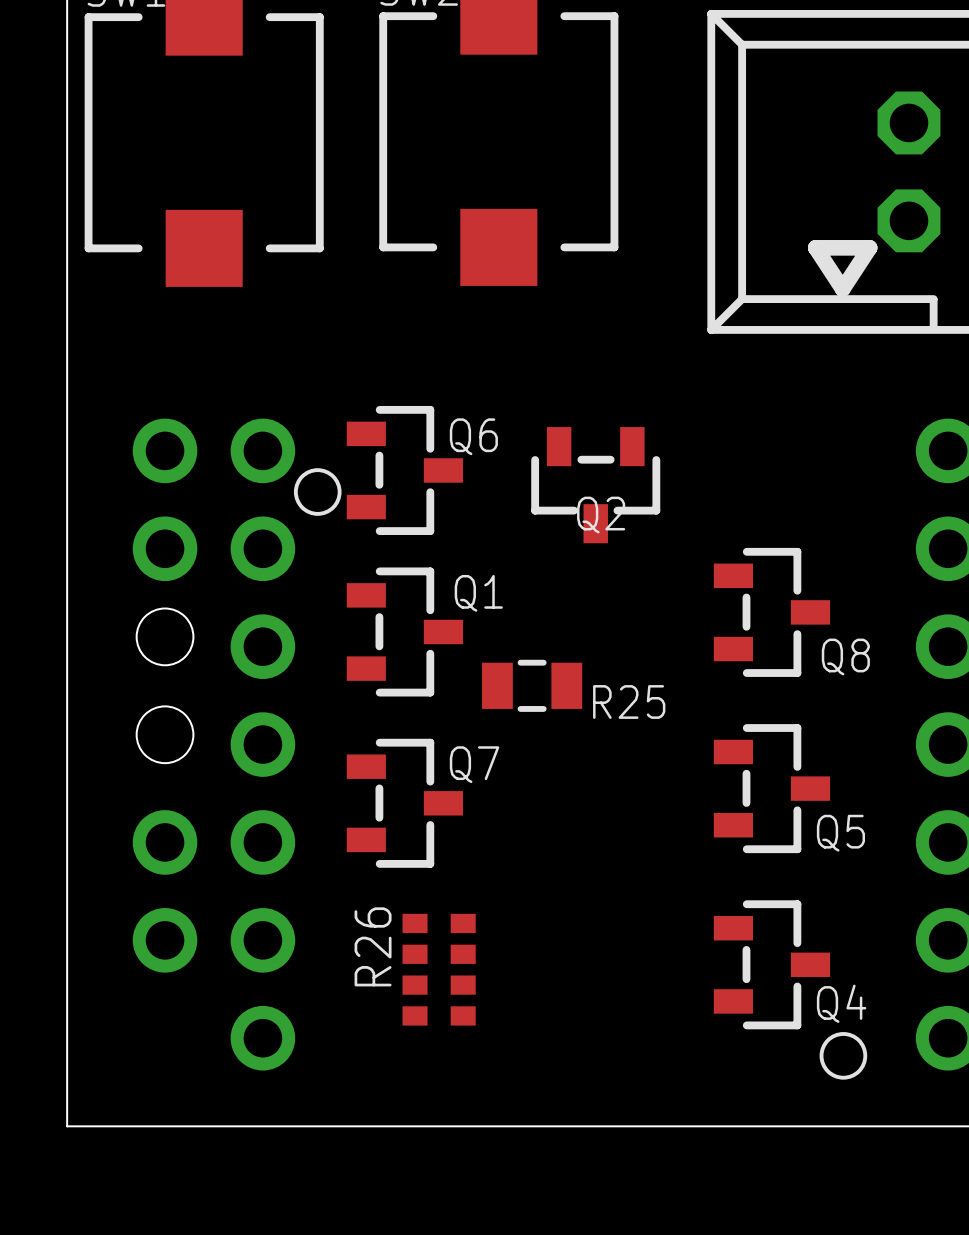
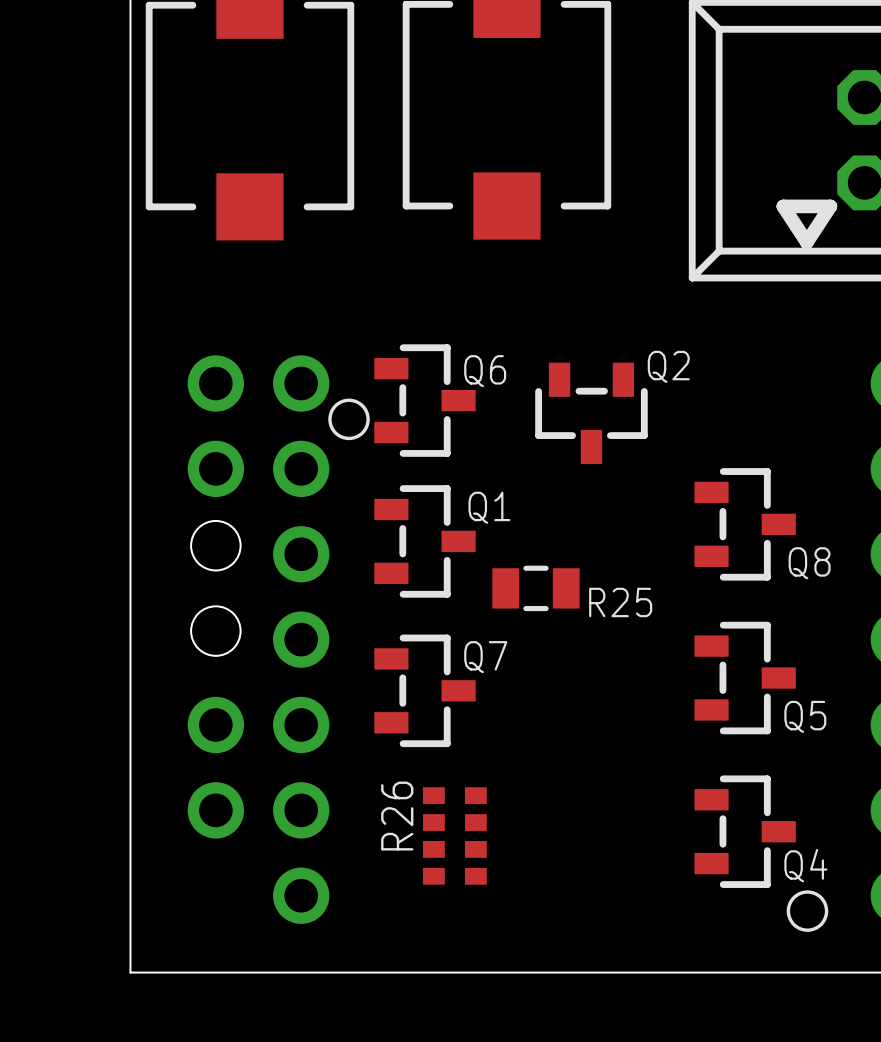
Q2 name position: Q2 (601, 515) -> Q2 (668, 366)

